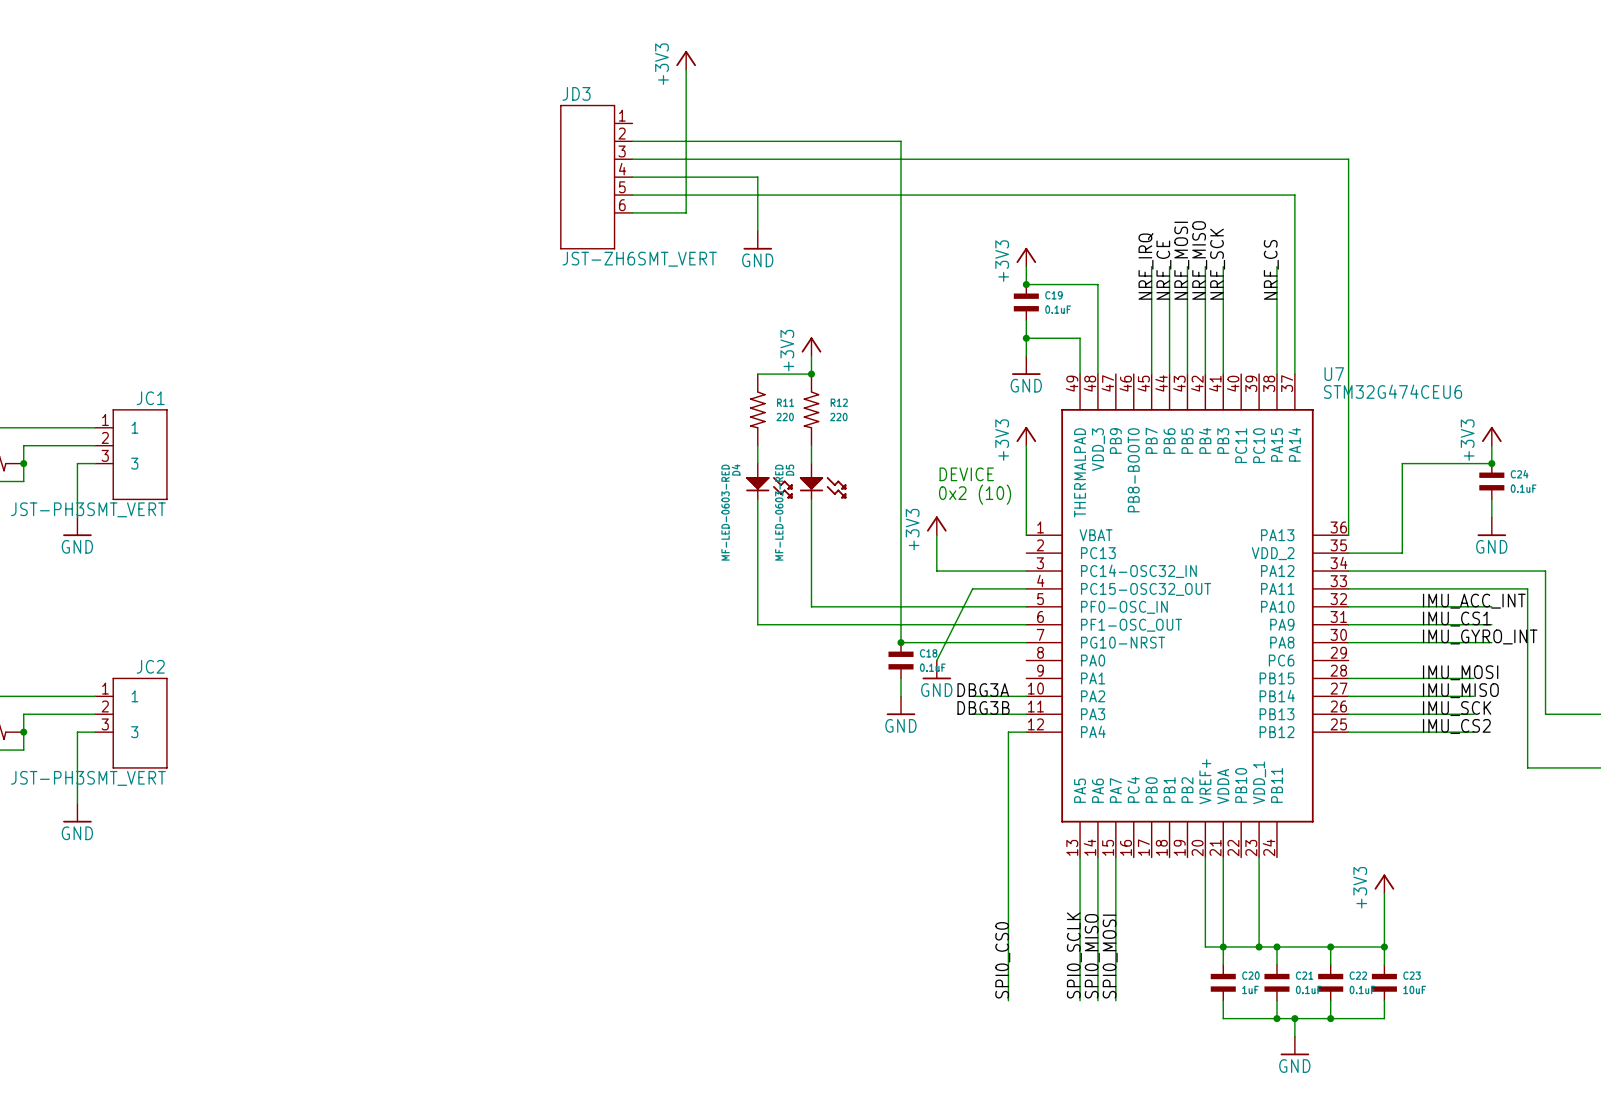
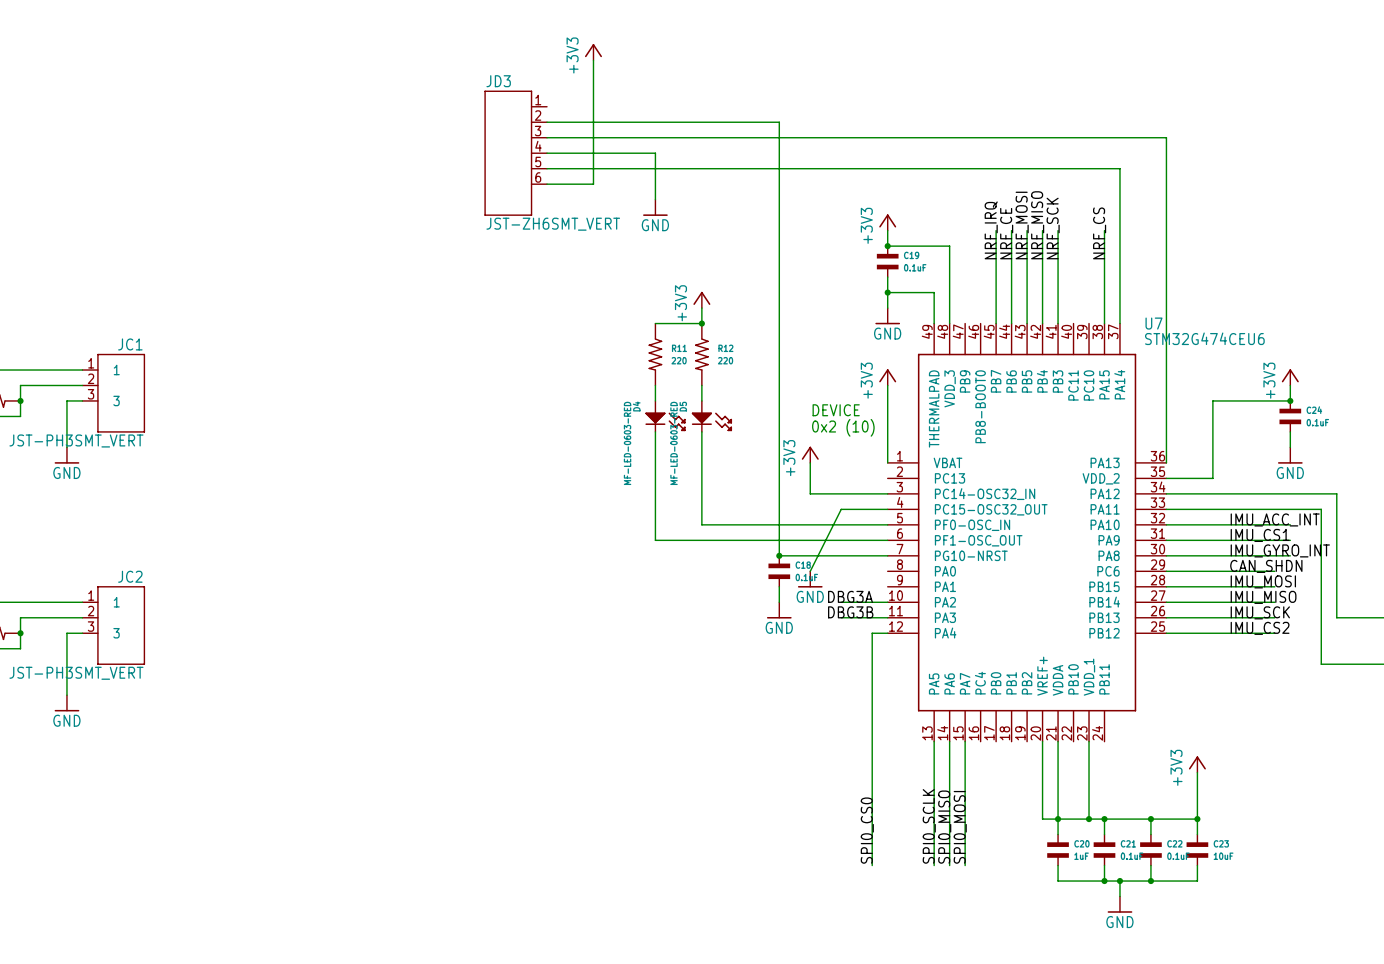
label: none -> CAN_SHDN (1266, 566)
wire: none -> (1166, 571) (1274, 571)

